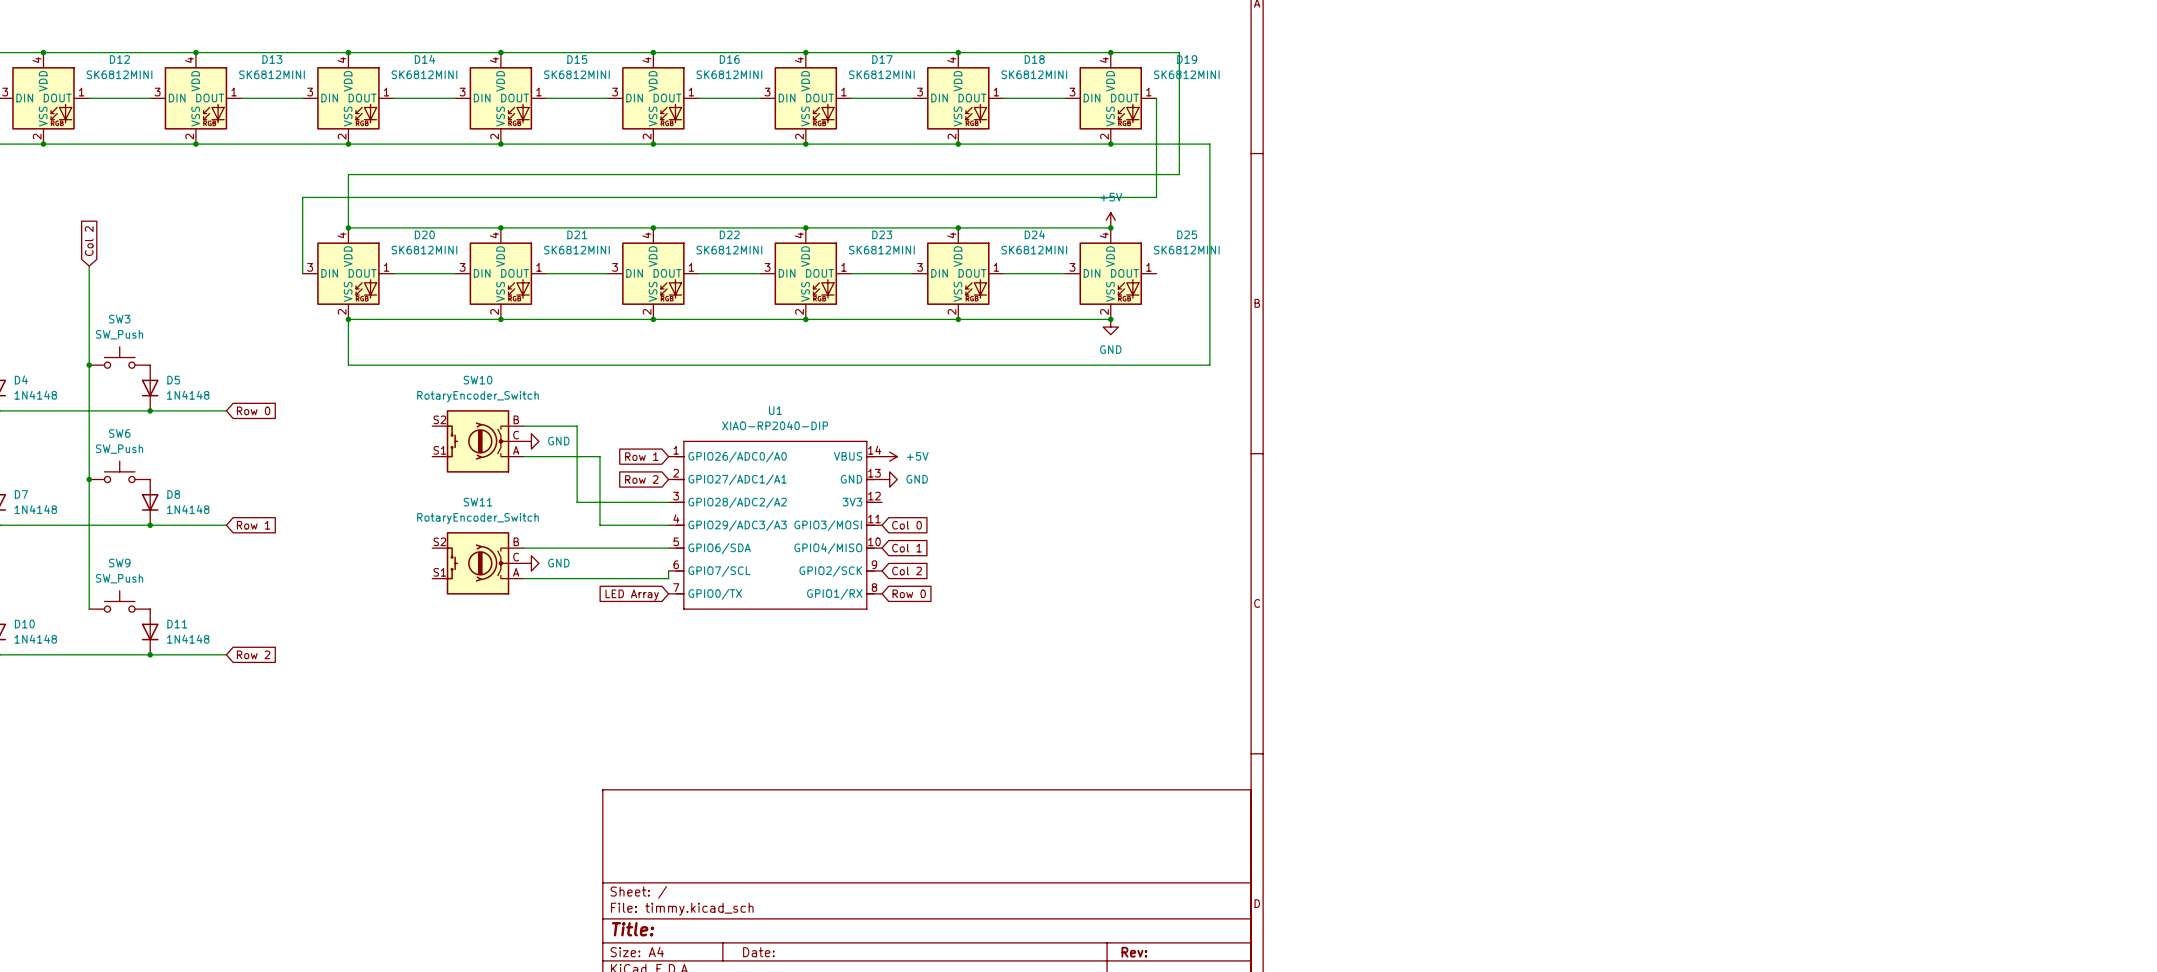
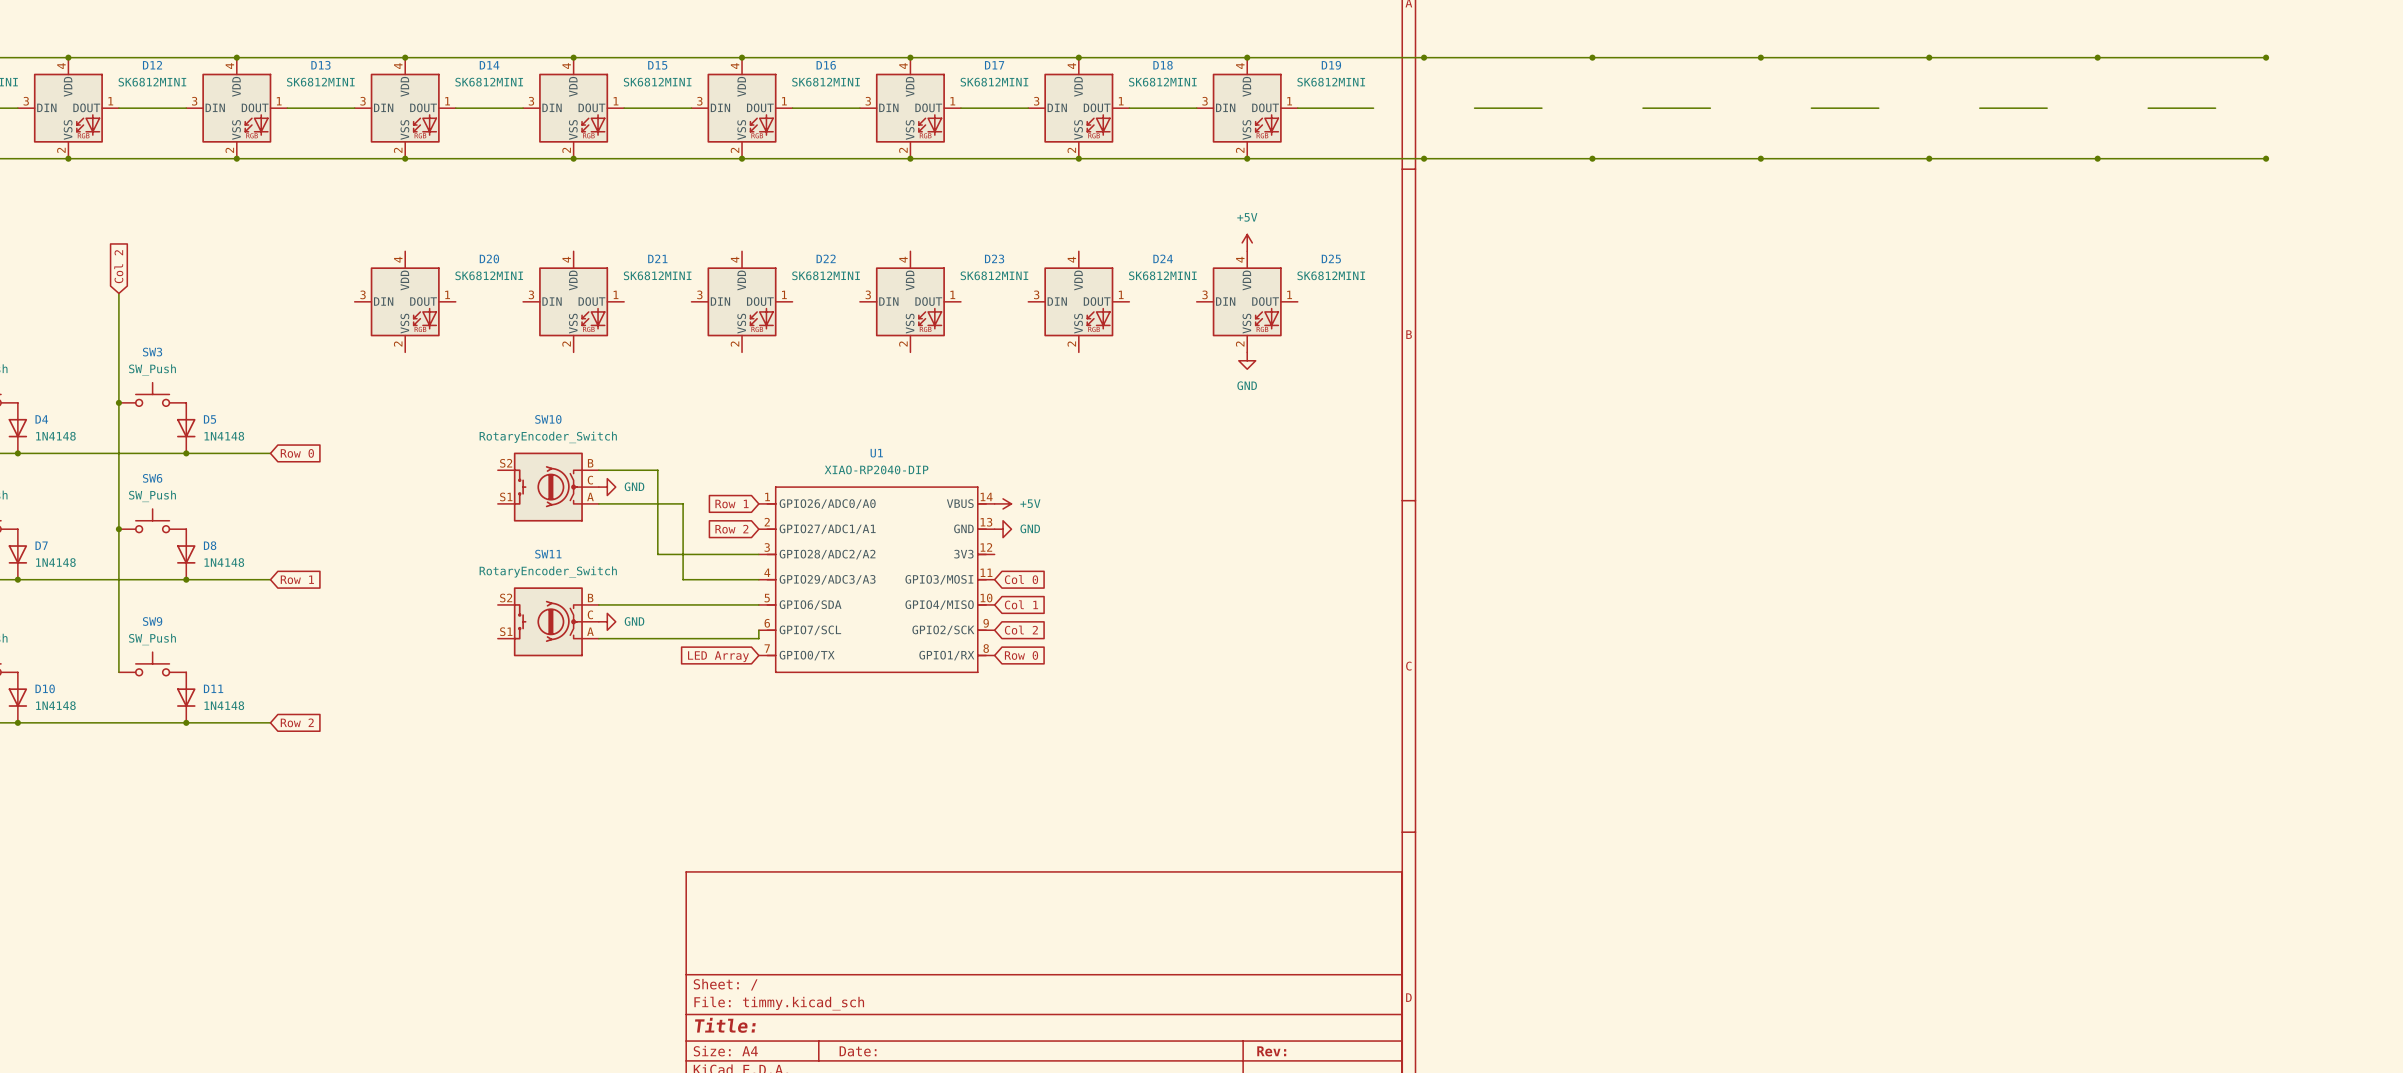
wire: (1179, 52) (1179, 174) (348, 174) (348, 227) (1110, 227) -> (1323, 57) (2266, 57)
junction: none -> (1424, 57)
junction: none -> (1592, 57)
junction: none -> (1760, 57)
junction: none -> (1929, 57)
junction: none -> (2097, 57)
junction: none -> (2266, 57)
wire: (1156, 98) (1156, 197) (302, 197) (302, 273) -> (1297, 108) (1373, 108)
wire: none -> (1474, 108) (1541, 108)
wire: none -> (1642, 108) (1710, 108)
wire: none -> (1811, 108) (1878, 108)
wire: none -> (1979, 108) (2047, 108)
wire: none -> (2148, 108) (2215, 108)
wire: (1209, 144) (1209, 365) (348, 365) (348, 319) (1110, 319) -> (1356, 158) (2266, 158)
junction: none -> (1424, 158)
junction: none -> (1592, 158)
junction: none -> (1760, 158)
junction: none -> (1929, 158)
junction: none -> (2097, 158)
junction: none -> (2266, 158)
junction: (348, 227) -> none
junction: (500, 227) -> none
junction: (653, 227) -> none
junction: (805, 227) -> none
junction: (958, 227) -> none
junction: (1110, 227) -> none
wire: (394, 273) (455, 273) -> none
wire: (546, 273) (607, 273) -> none
wire: (699, 273) (760, 273) -> none
wire: (851, 273) (912, 273) -> none
wire: (1004, 273) (1065, 273) -> none
junction: (348, 319) -> none
junction: (500, 319) -> none
junction: (653, 319) -> none
junction: (805, 319) -> none
junction: (958, 319) -> none
junction: (1110, 319) -> none

